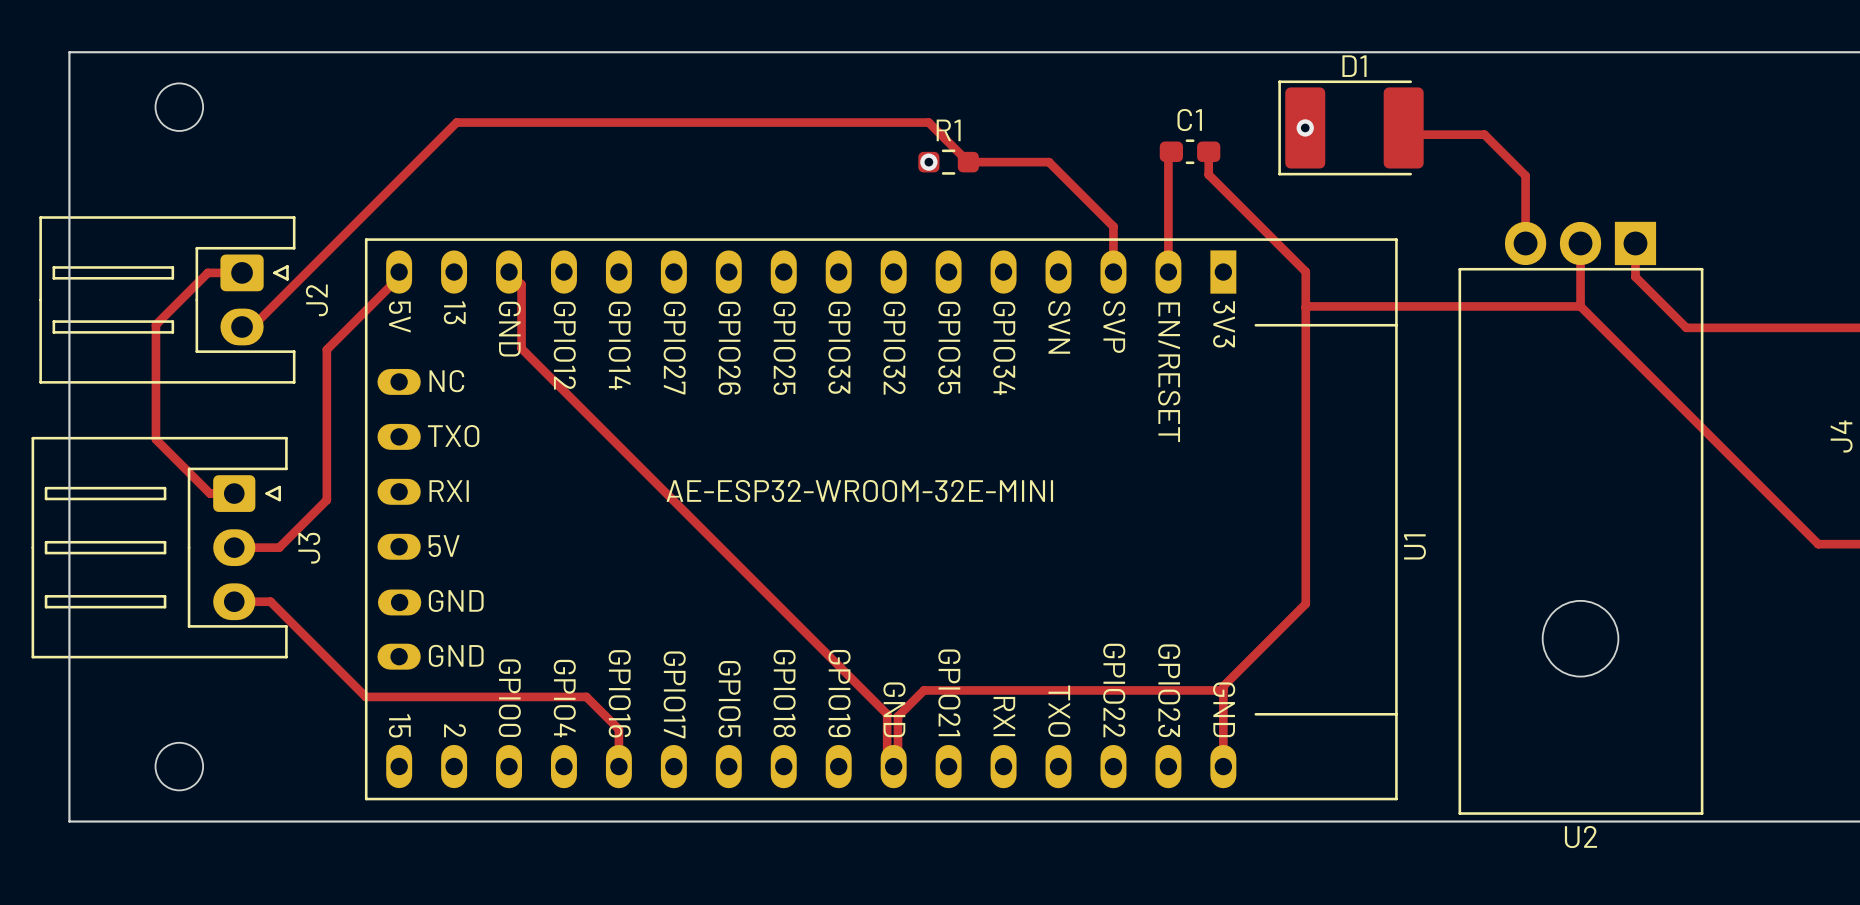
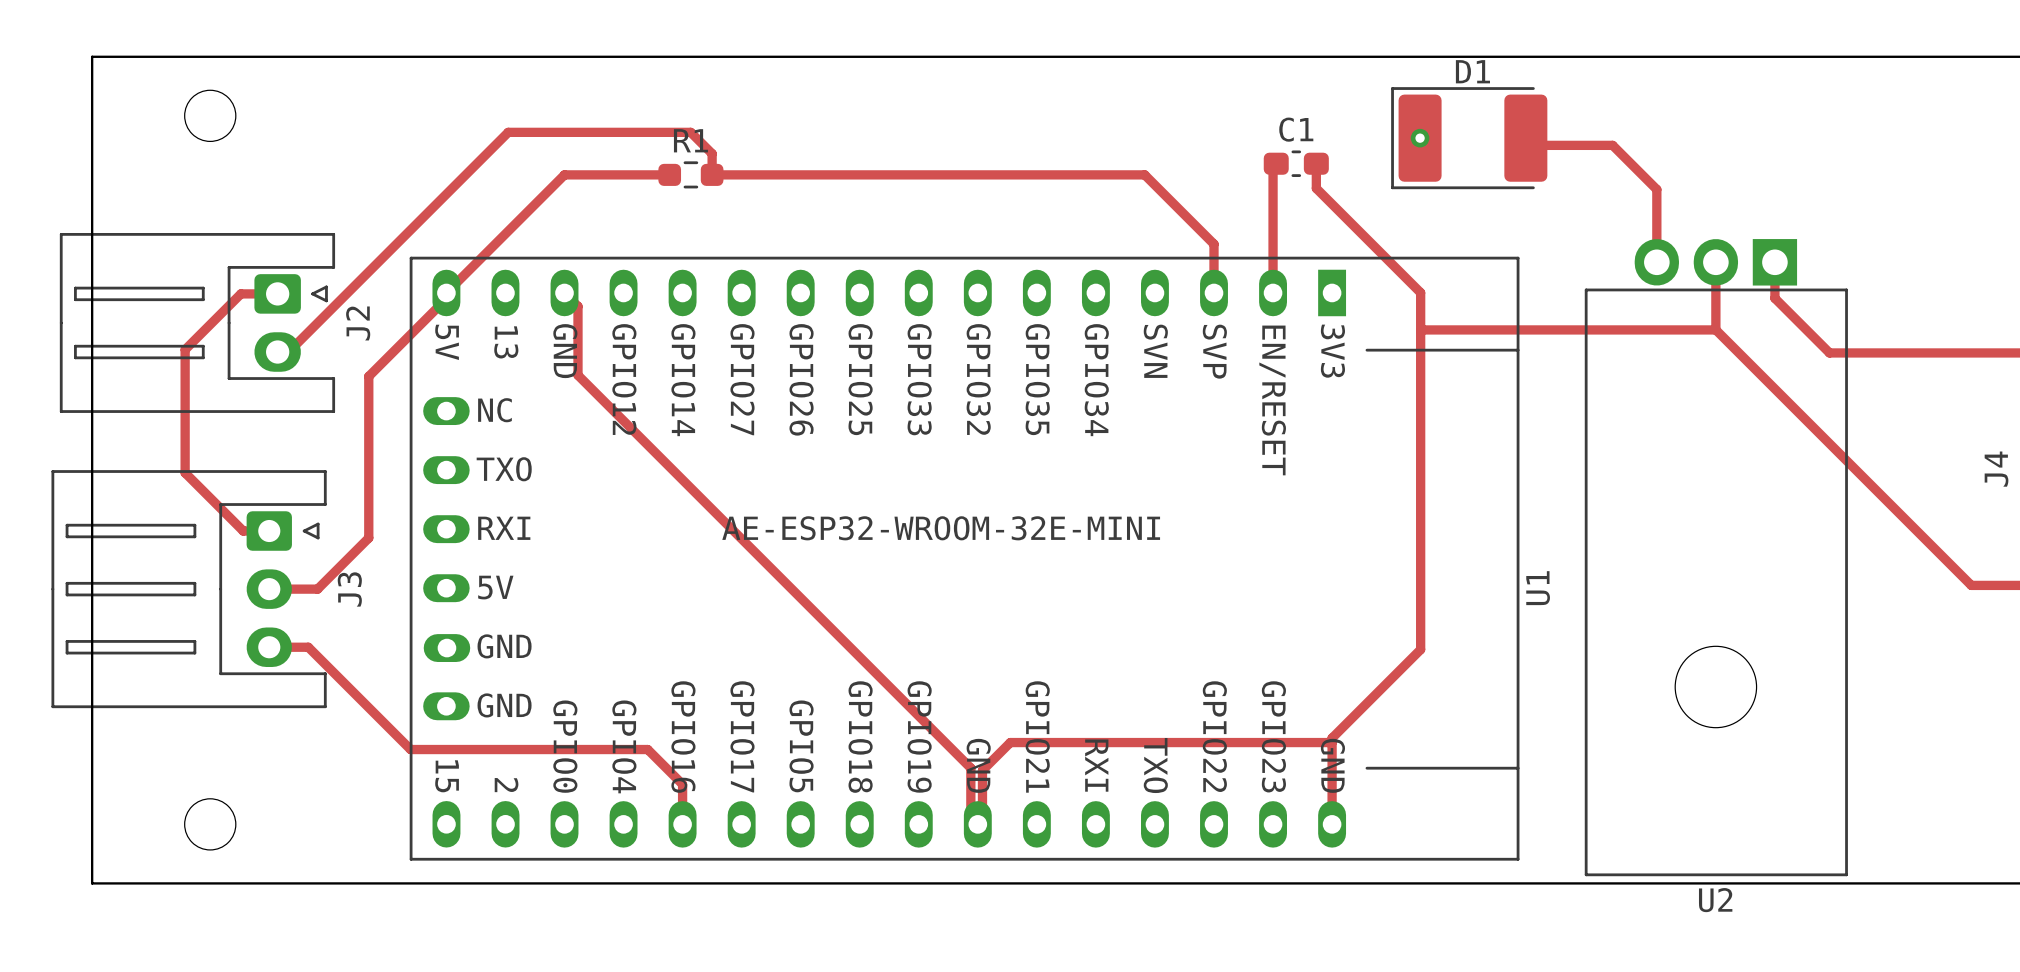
track: (626, 122) (928, 122) (968, 162) -> (690, 132) (712, 153) (712, 174) (1058, 174)
track: none -> (669, 174) (564, 174) (446, 292)
via: (928, 162) -> none
R1 position: (948, 162) -> (690, 174)

